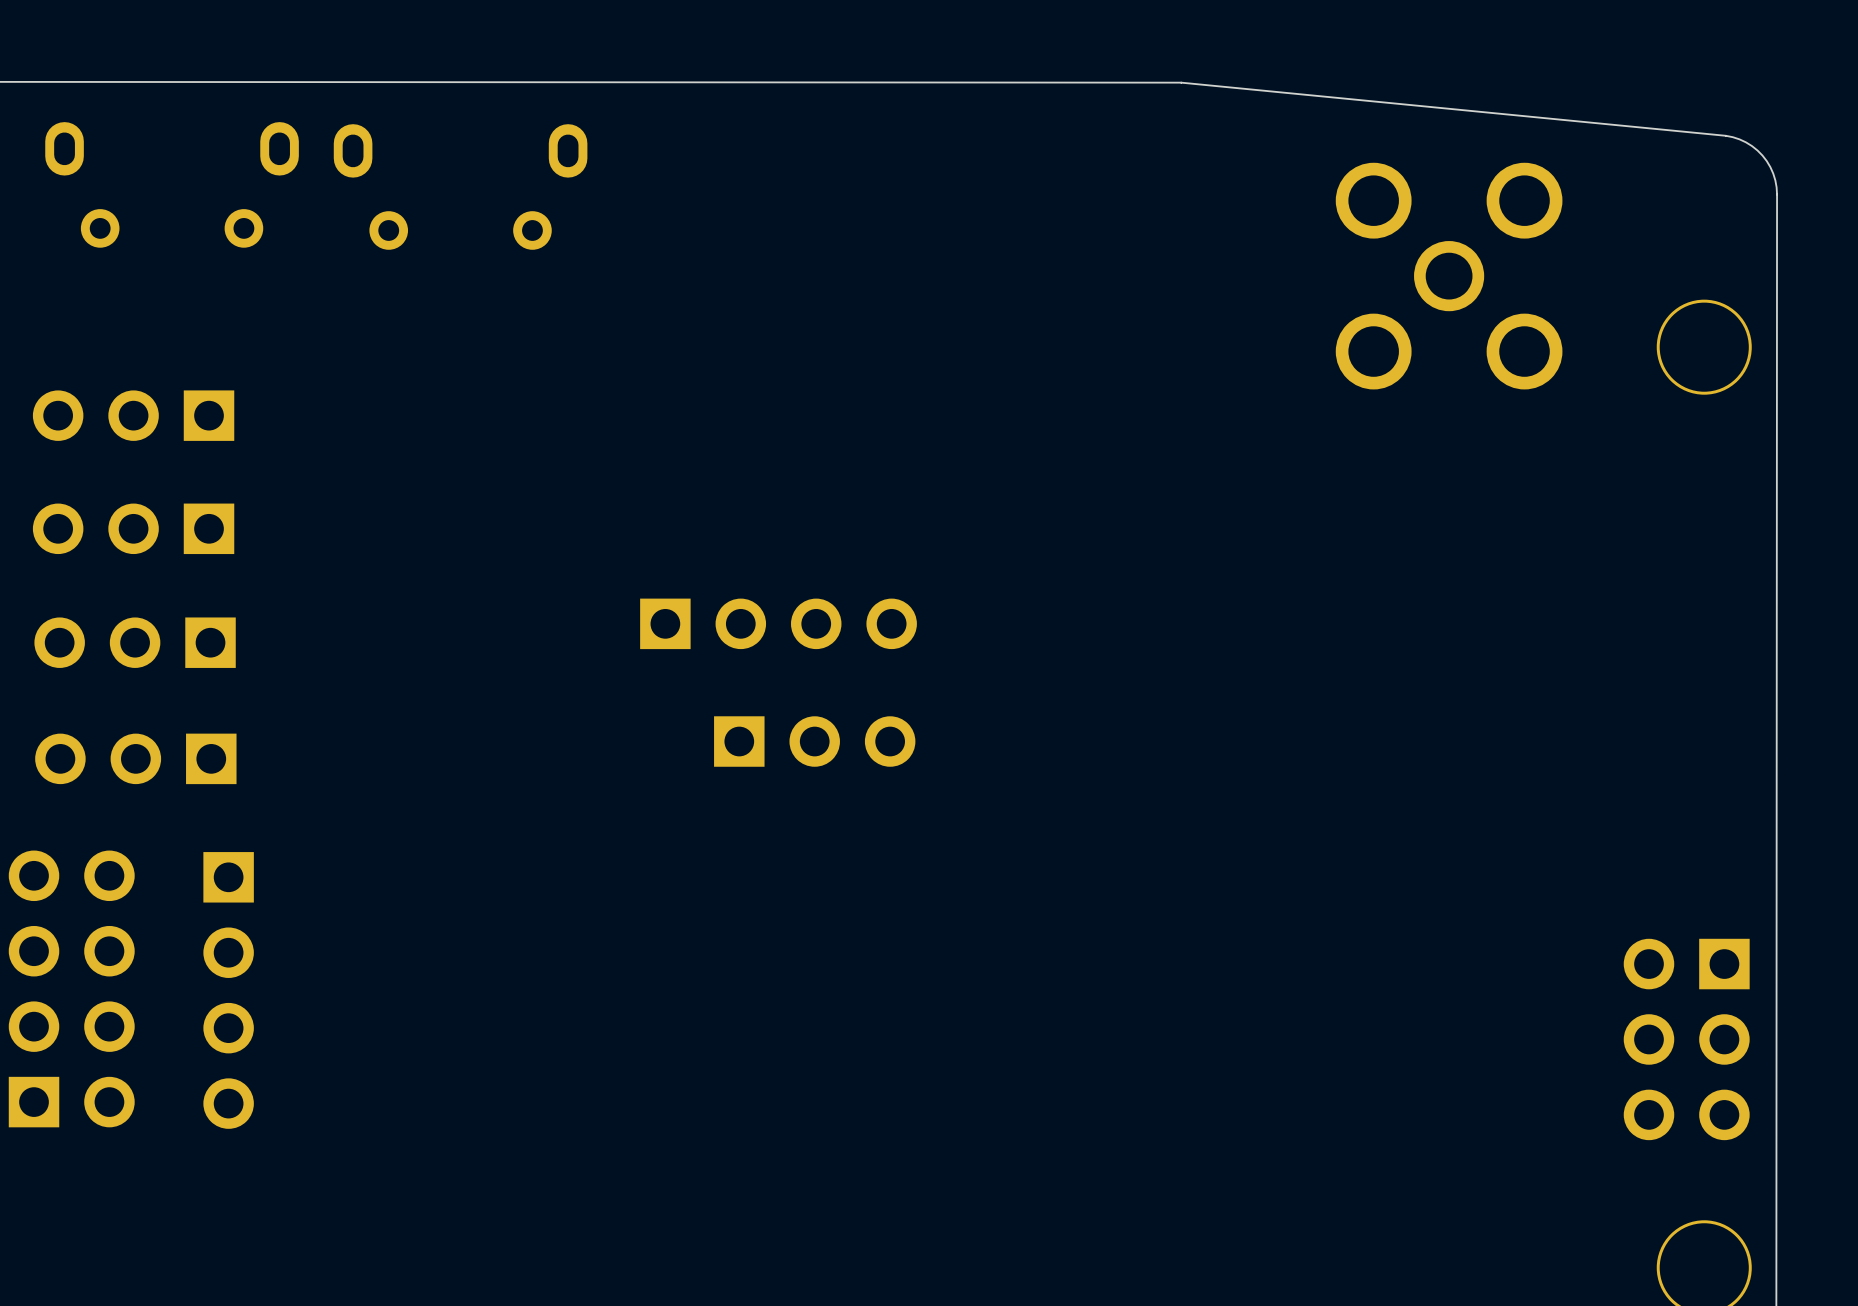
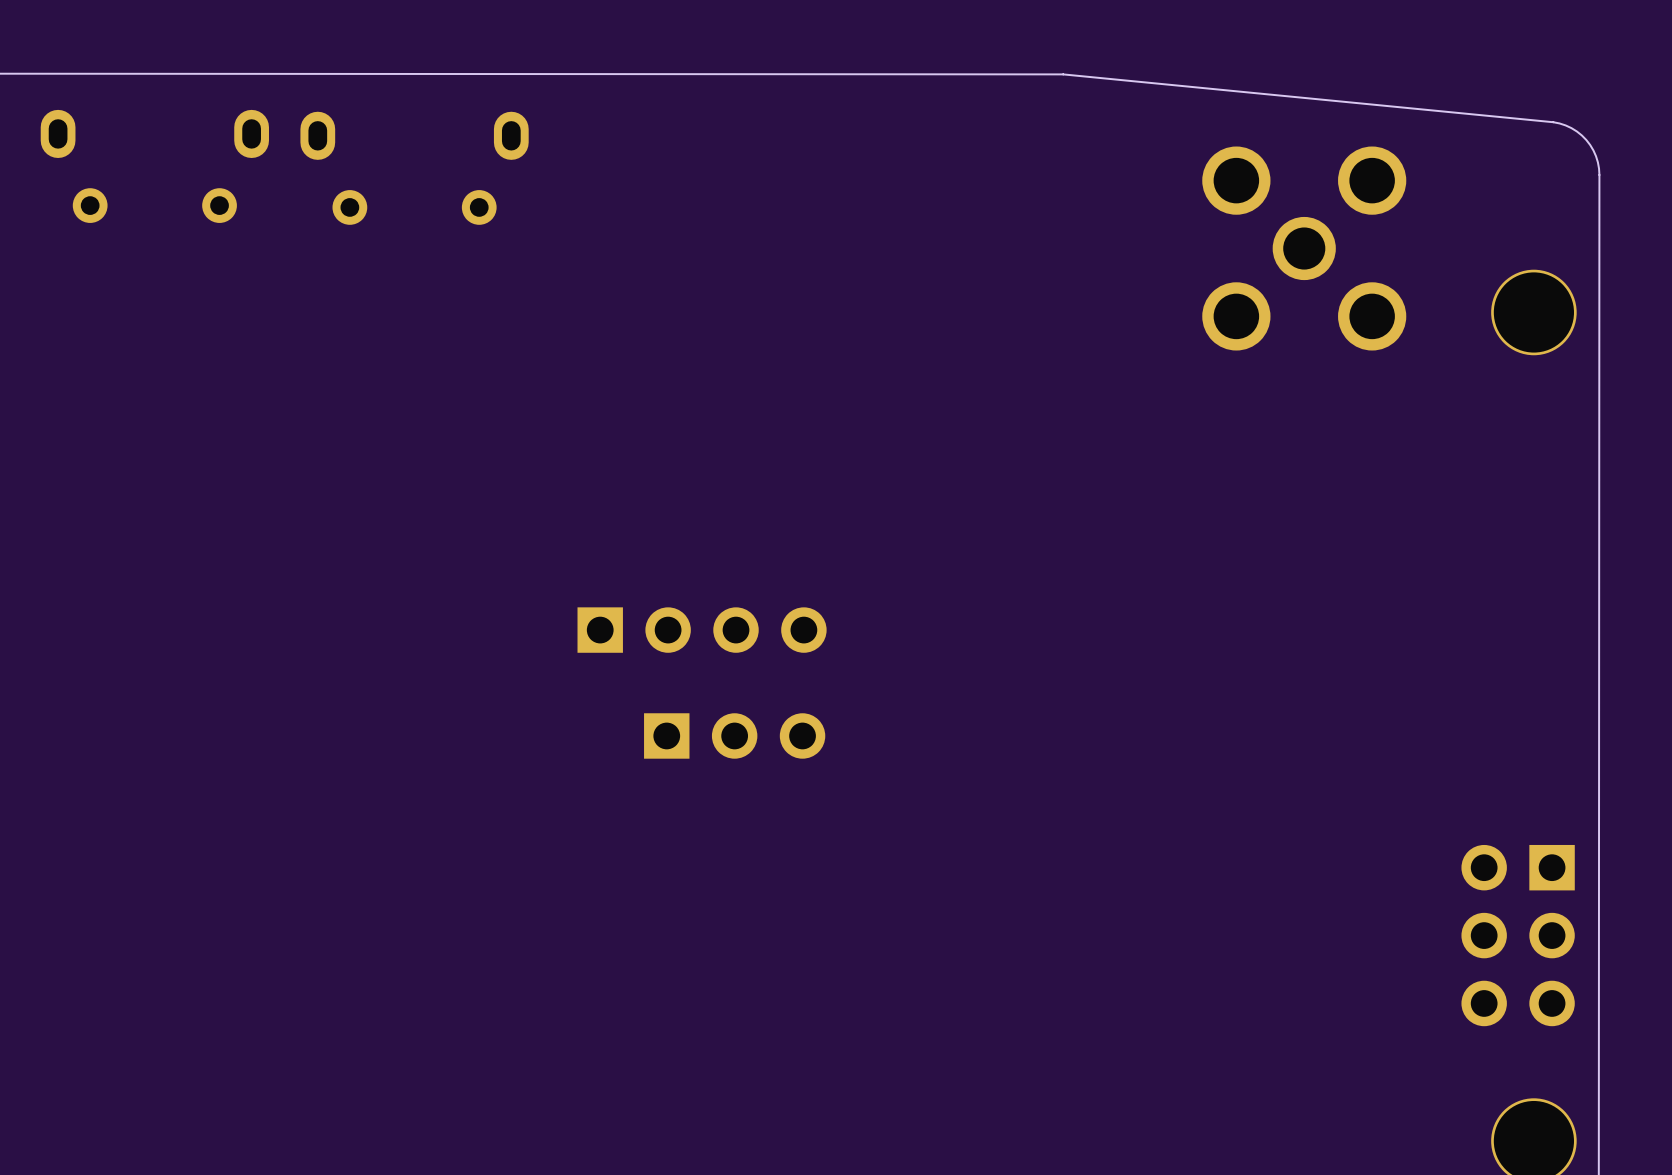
part: (133, 415) -> none
part: (133, 528) -> none
part position: (778, 623) -> (702, 630)
part: (135, 642) -> none
part position: (814, 741) -> (734, 735)
part: (135, 758) -> none
part: (71, 988) -> none
part: (228, 990) -> none

